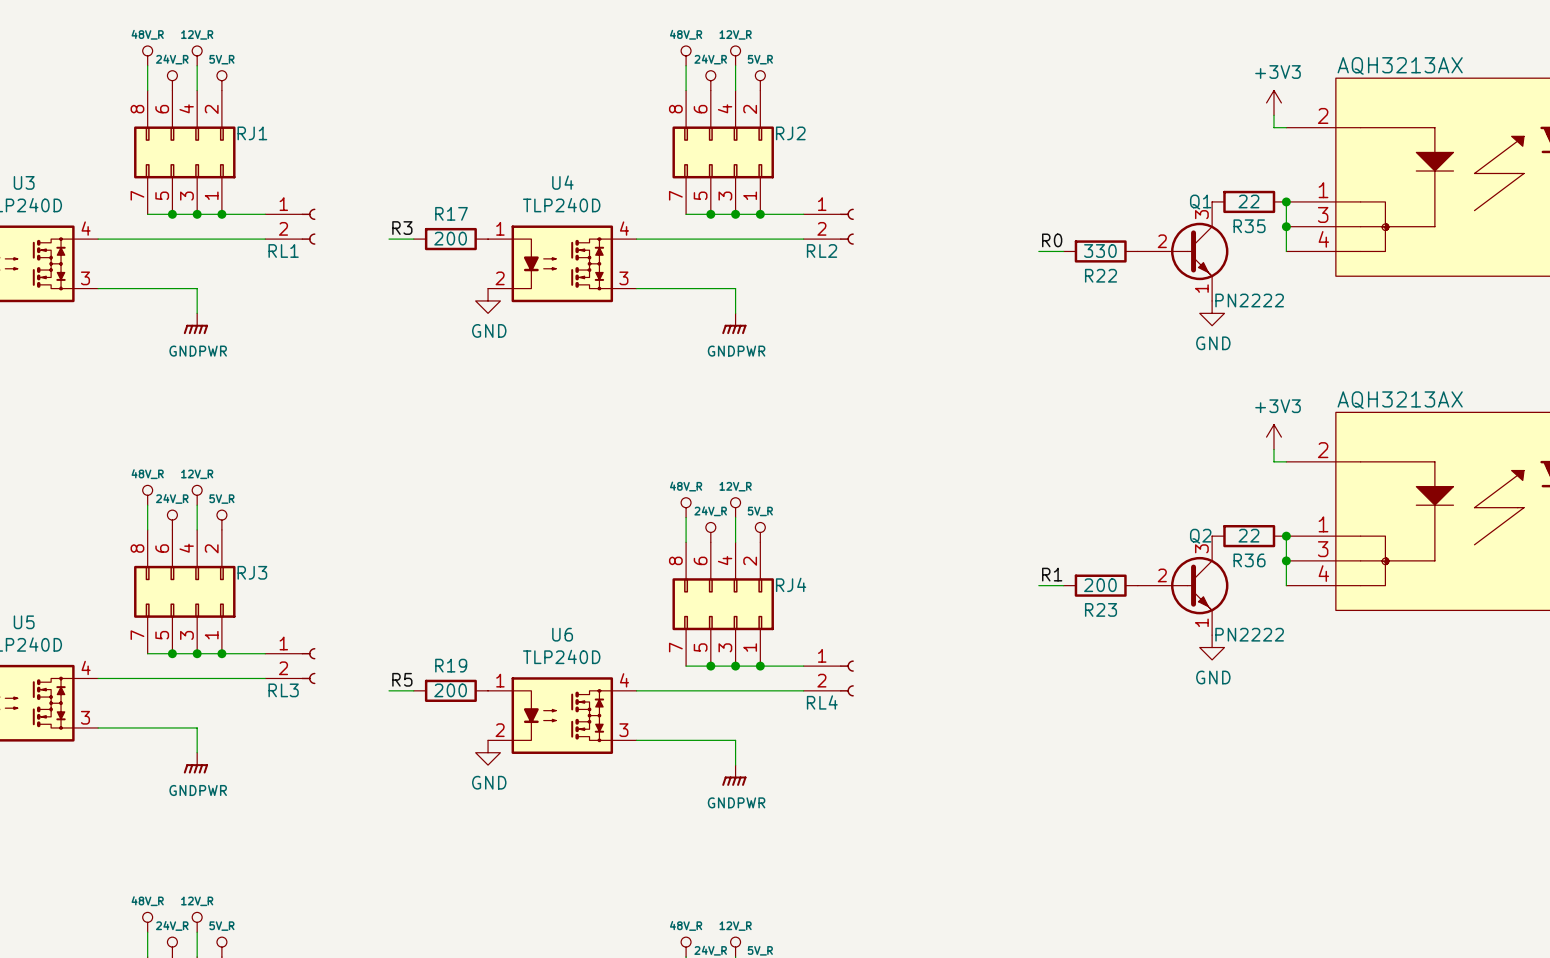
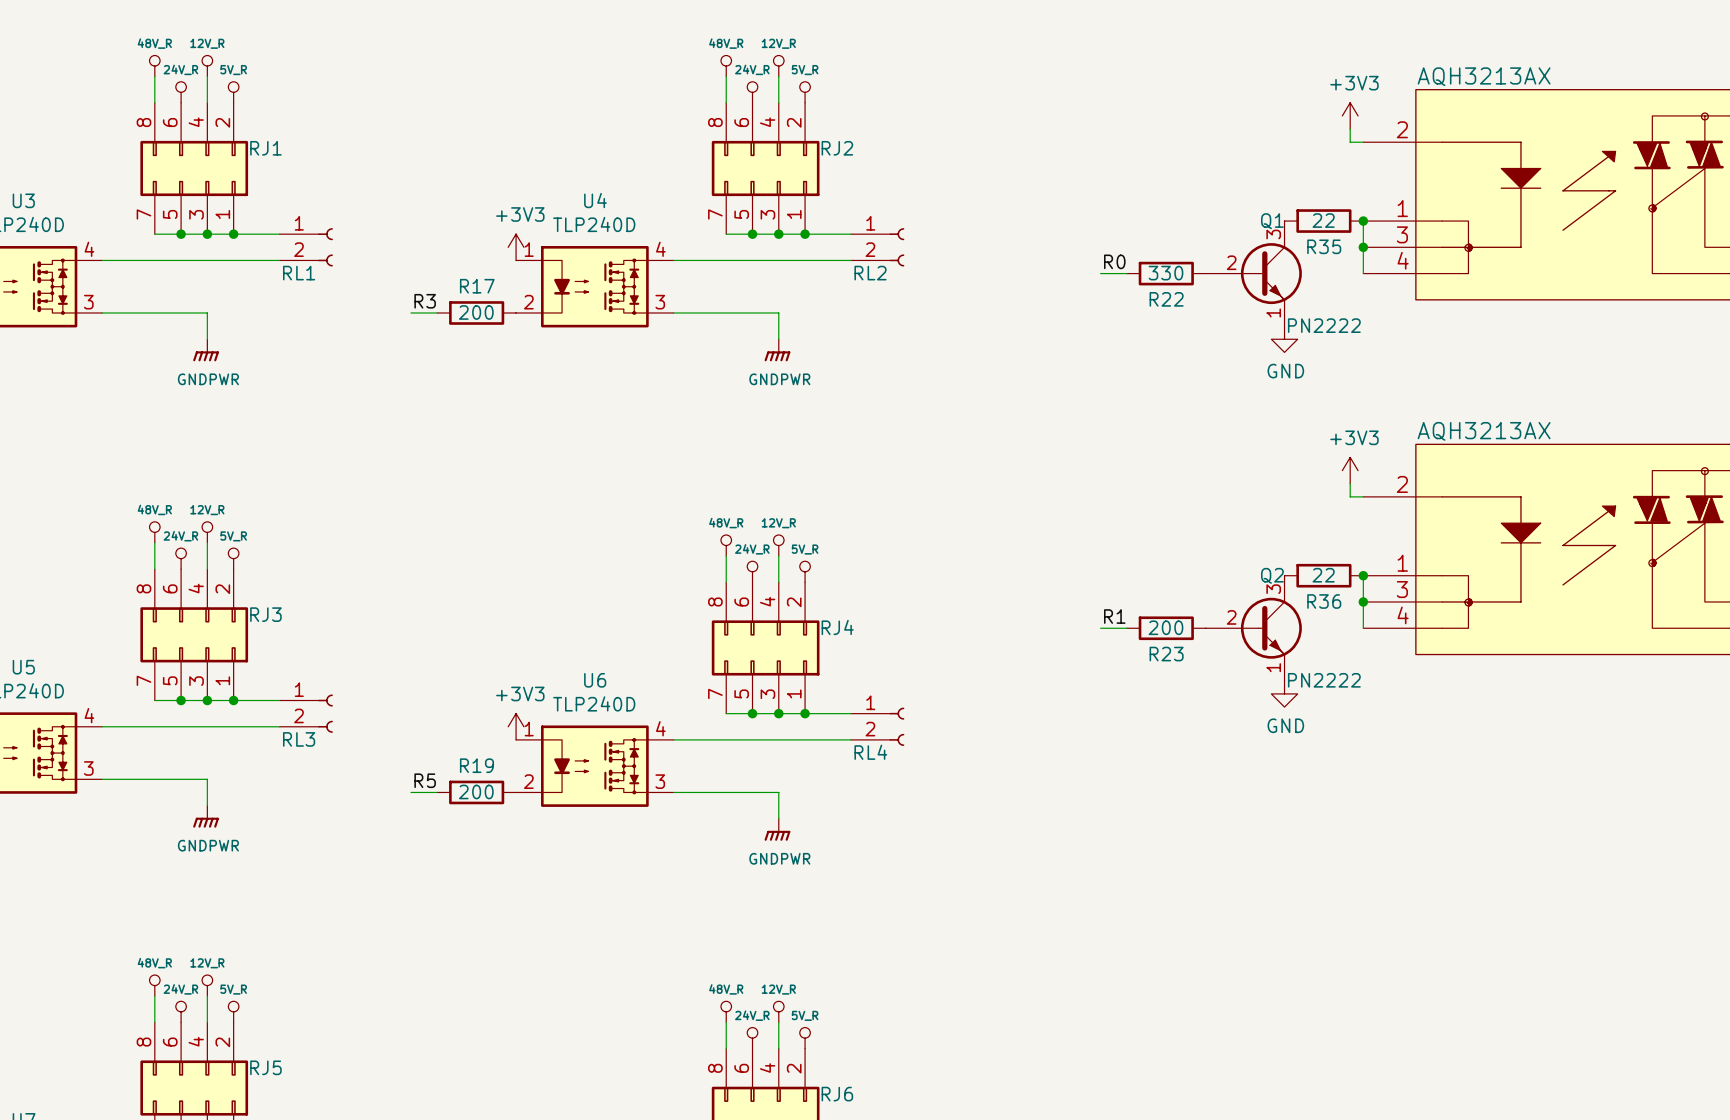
power symbol: none -> +3V3 (516, 247)
label position: R3 (402, 228) -> R3 (425, 301)
wire: (389, 239) (413, 239) -> (410, 312) (437, 312)
R17 position: (450, 239) -> (476, 312)
power symbol: GND (488, 300) -> none
power symbol: none -> +3V3 (516, 726)
label position: R5 (402, 679) -> R5 (425, 780)
wire: (389, 690) (413, 690) -> (410, 792) (437, 792)
R19 position: (450, 690) -> (476, 792)
power symbol: GND (488, 752) -> none

